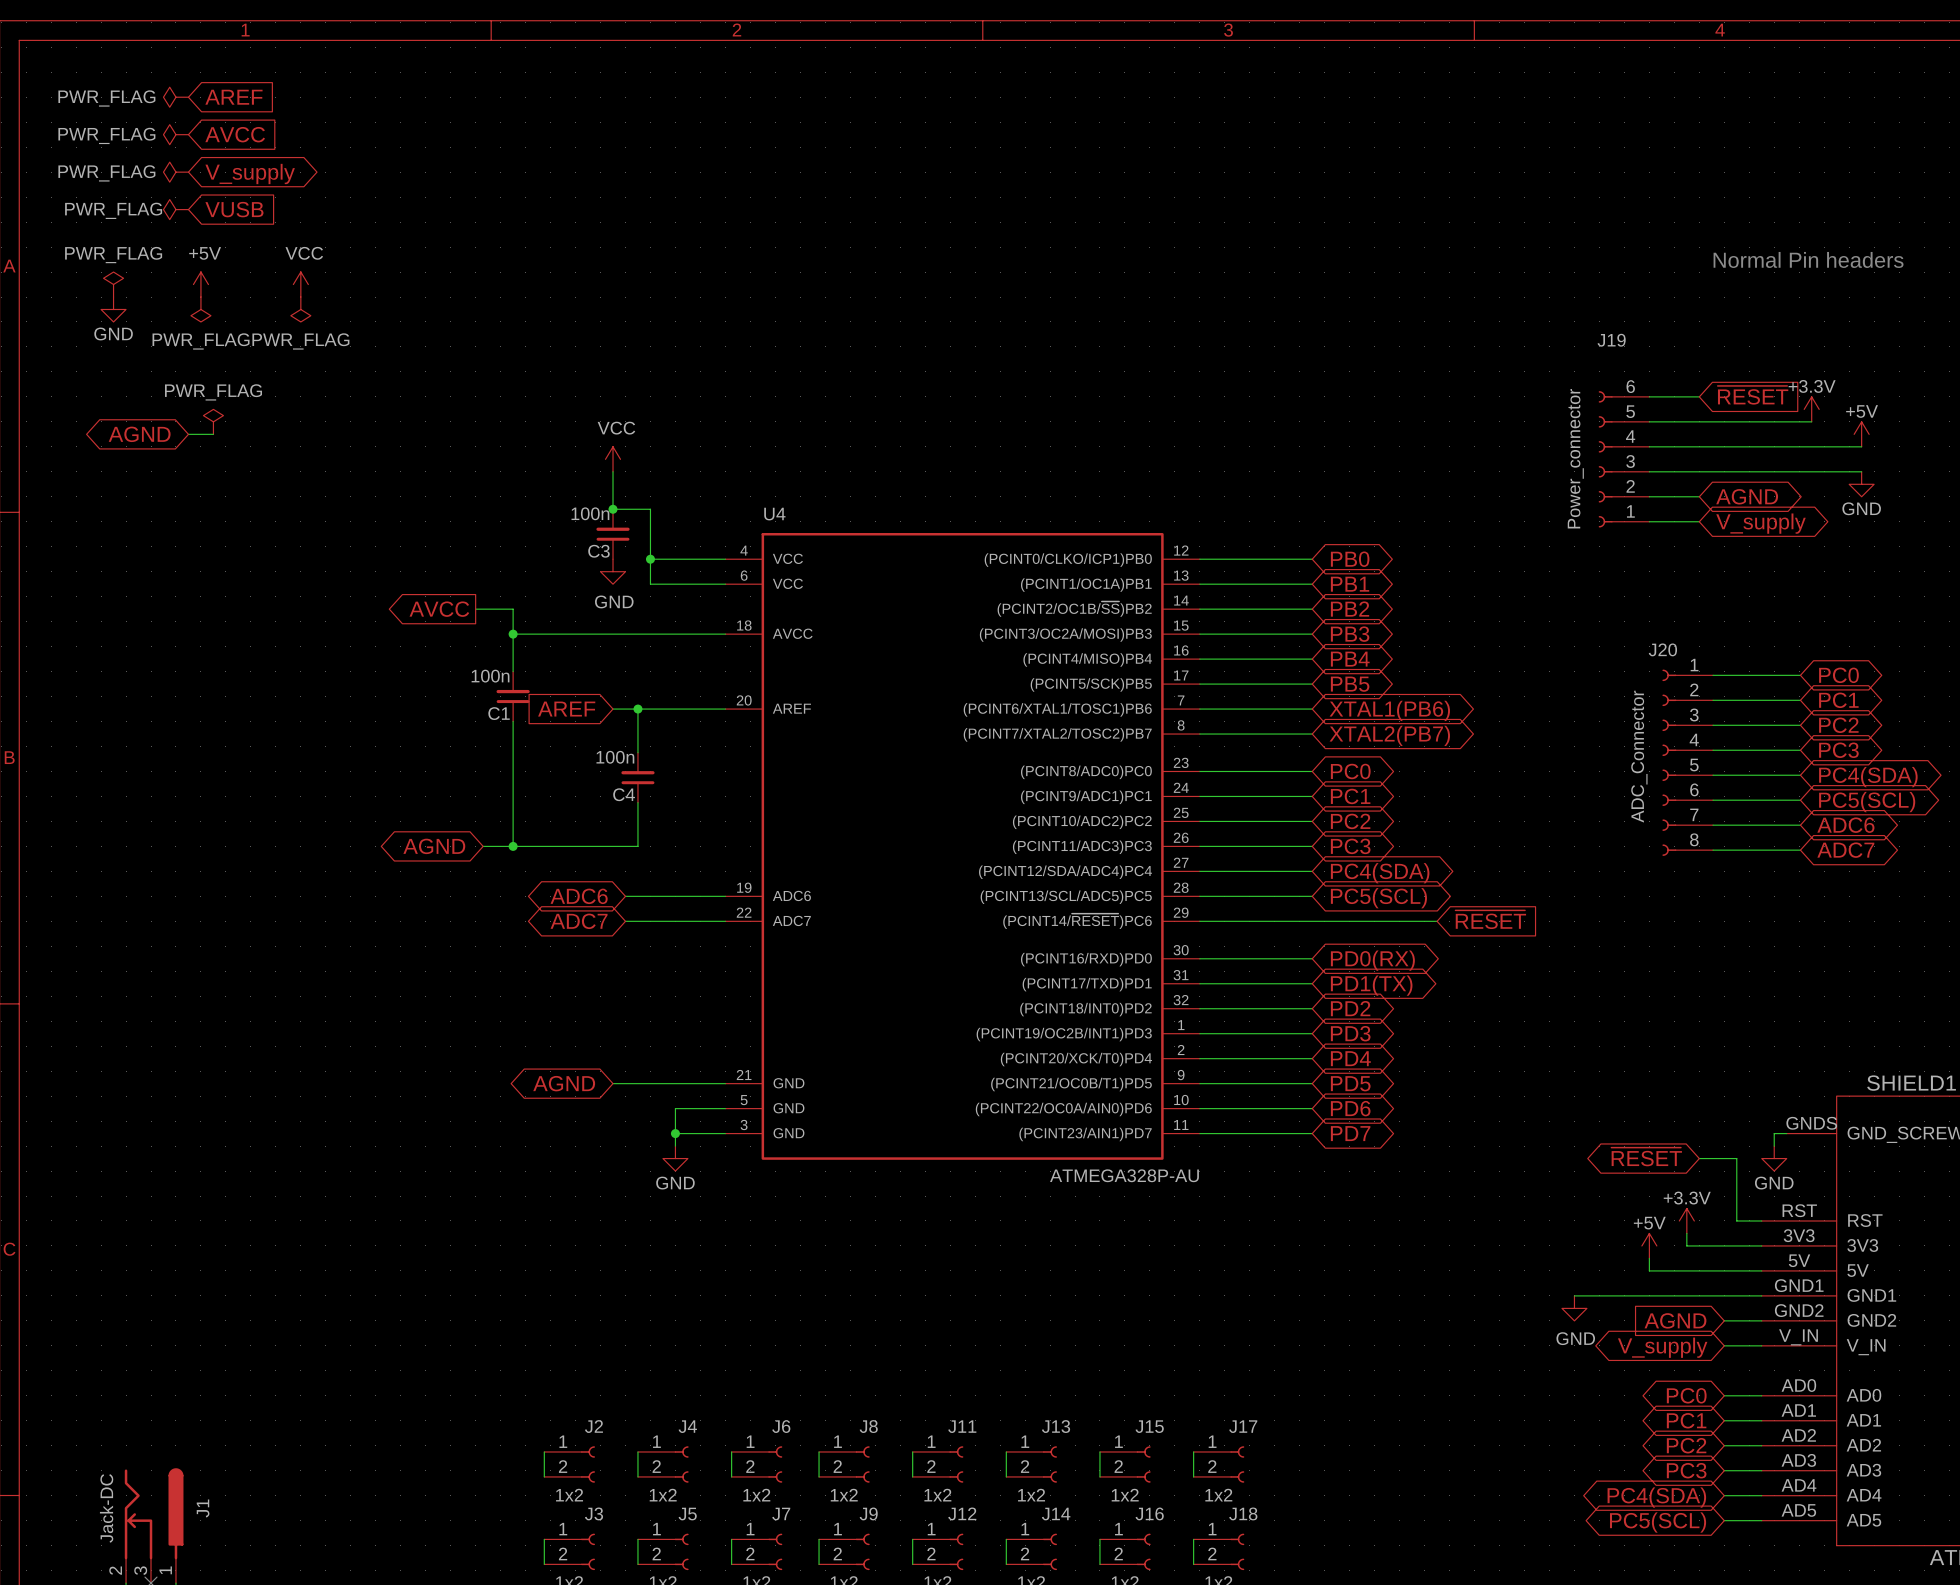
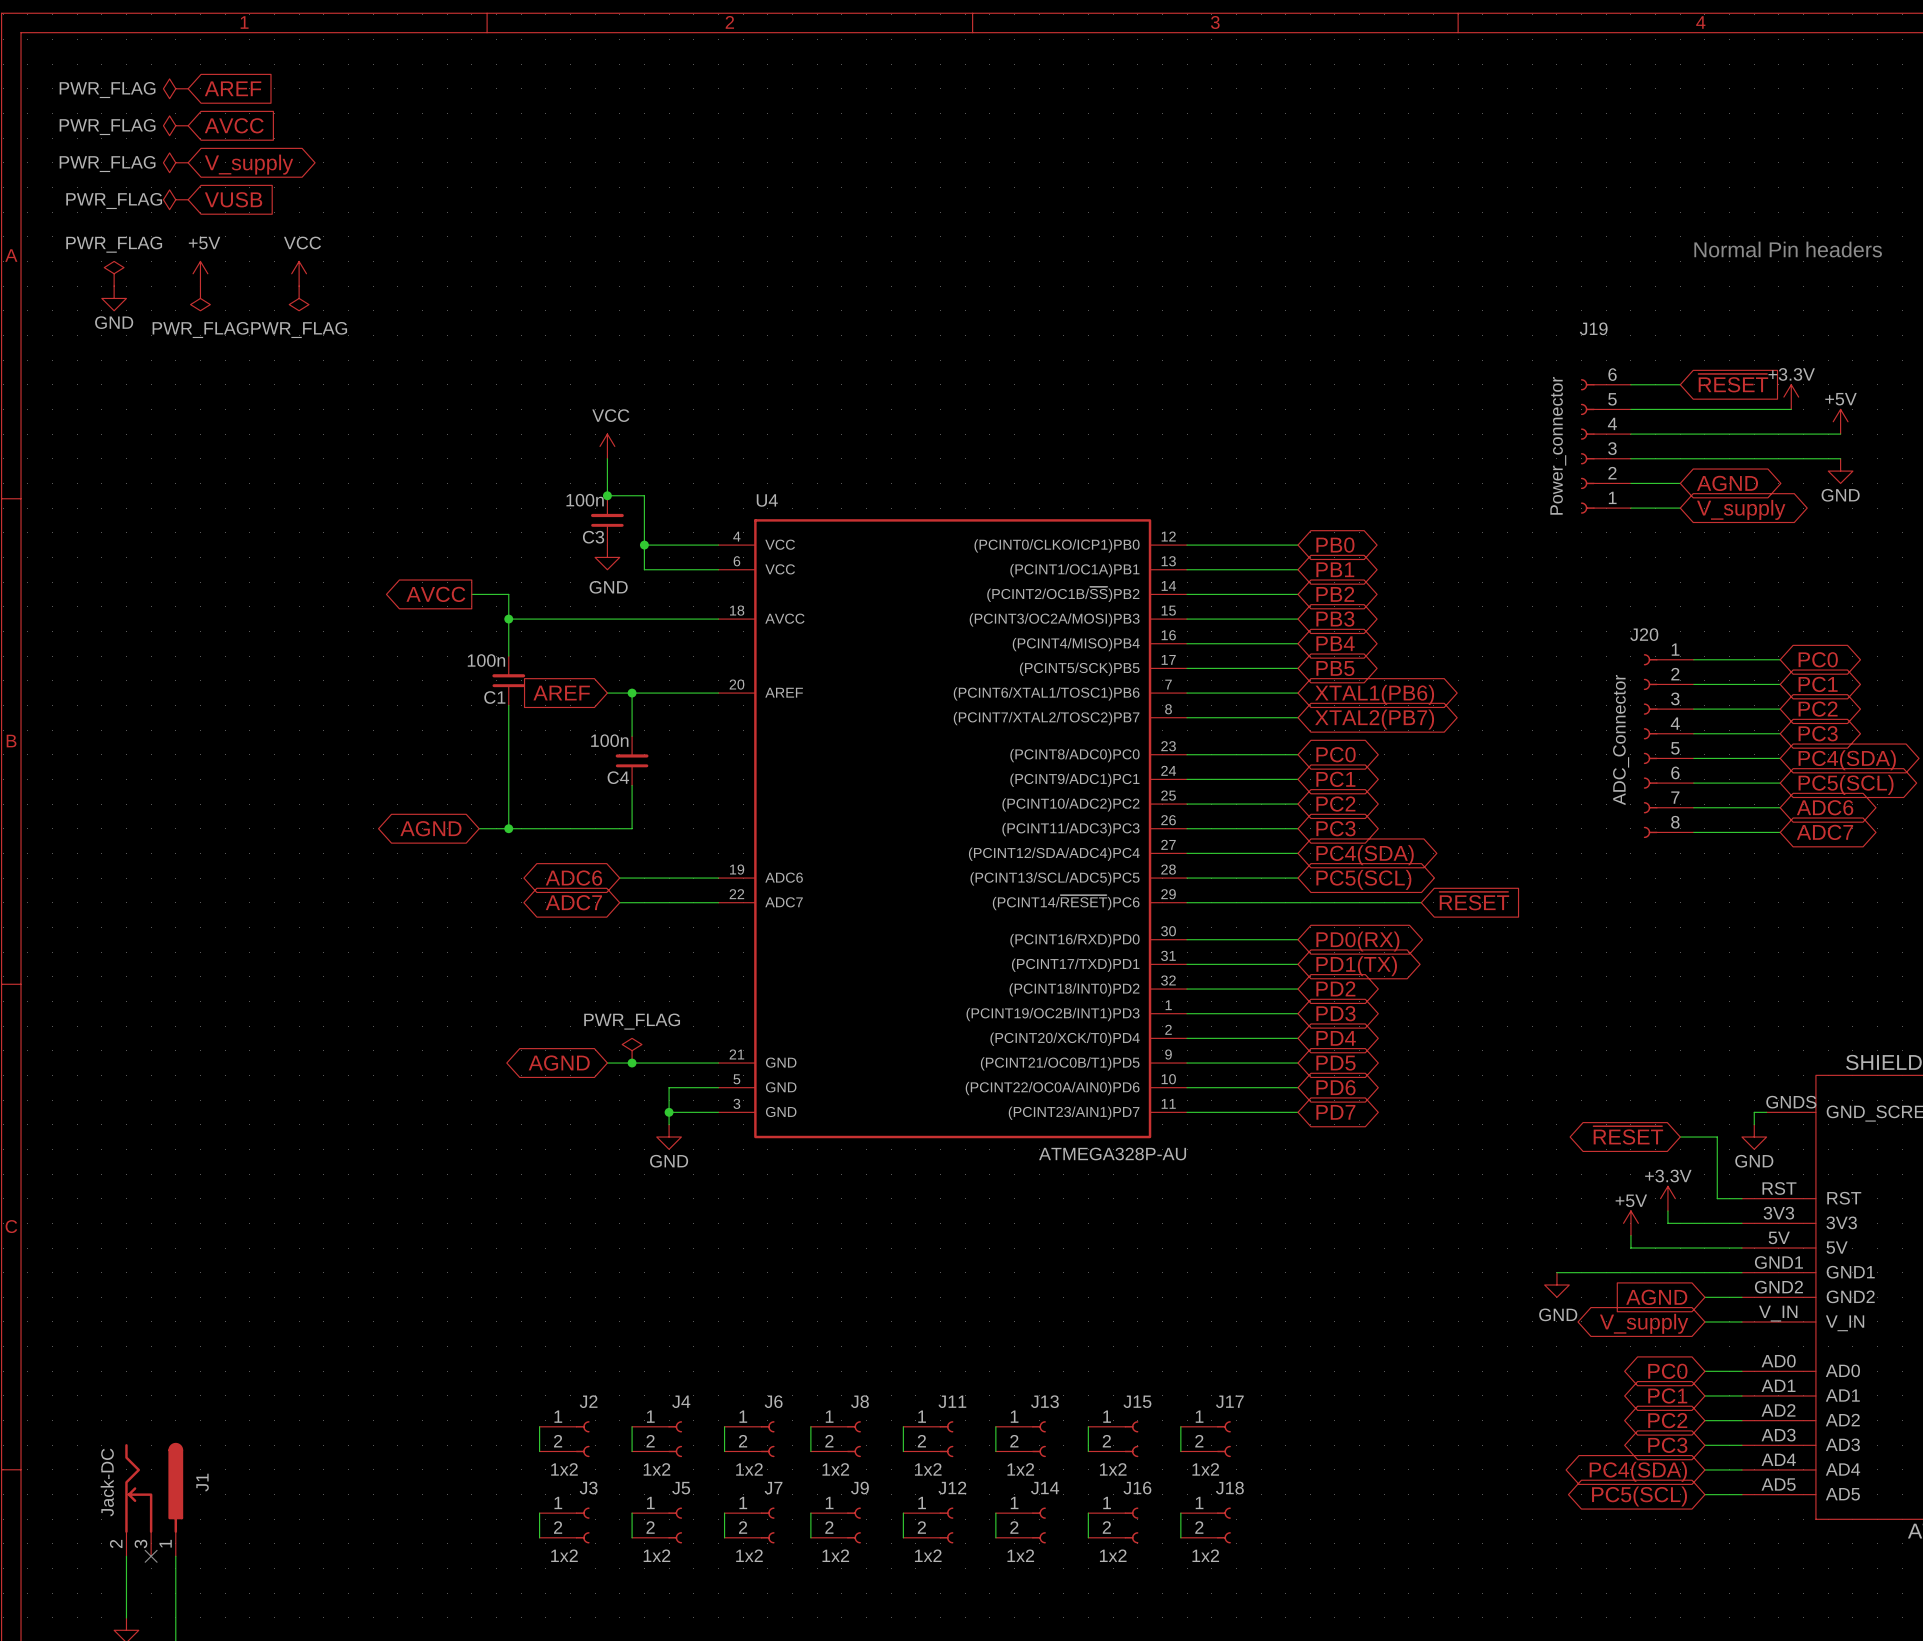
power symbol: PWR_FLAG (213, 421) -> none
global label: AGND (139, 434) -> none
wire: (188, 434) (213, 434) -> none
power symbol: none -> PWR_FLAG (632, 1050)
junction: none -> (632, 1063)

